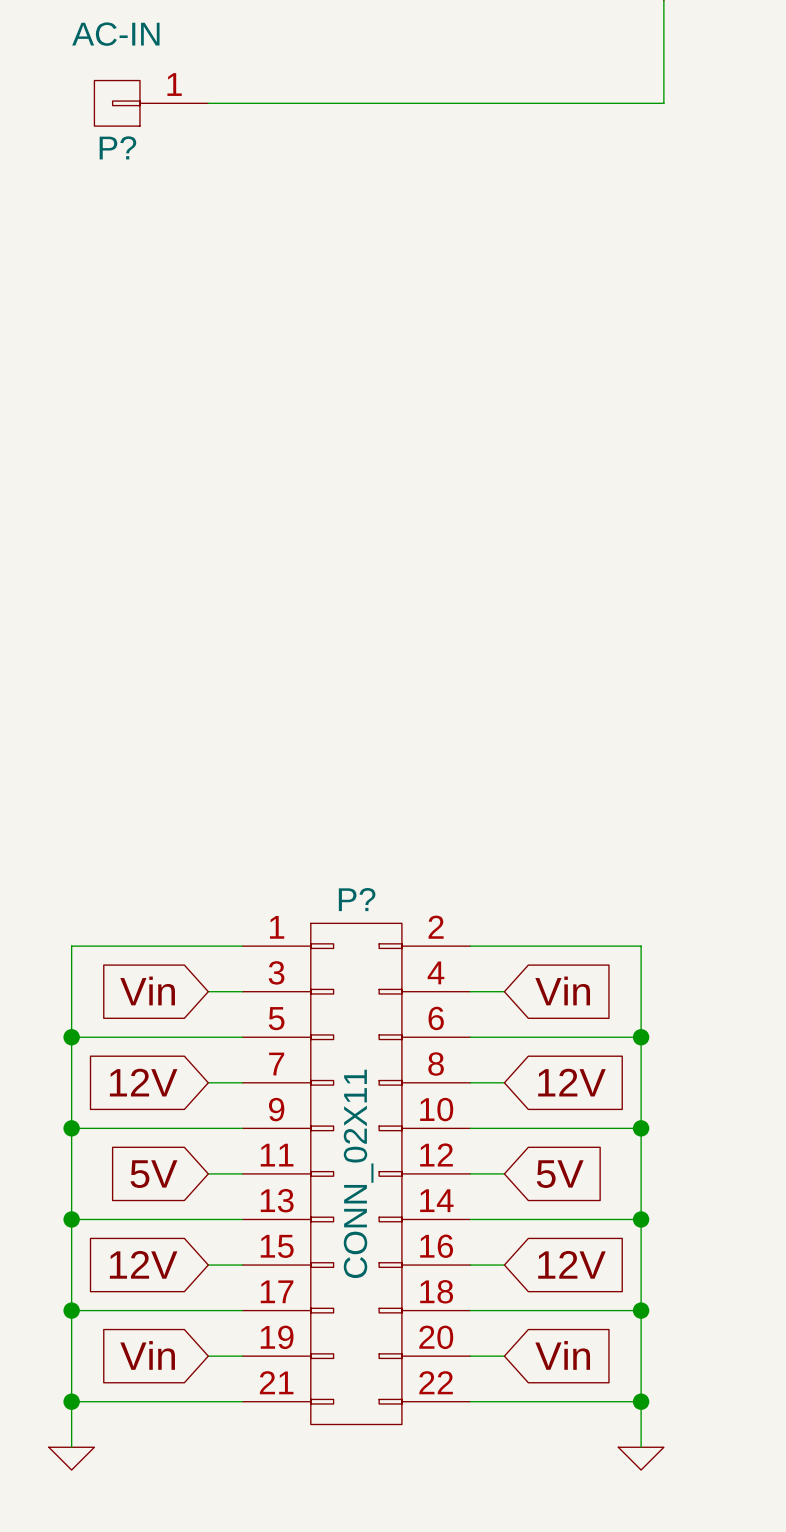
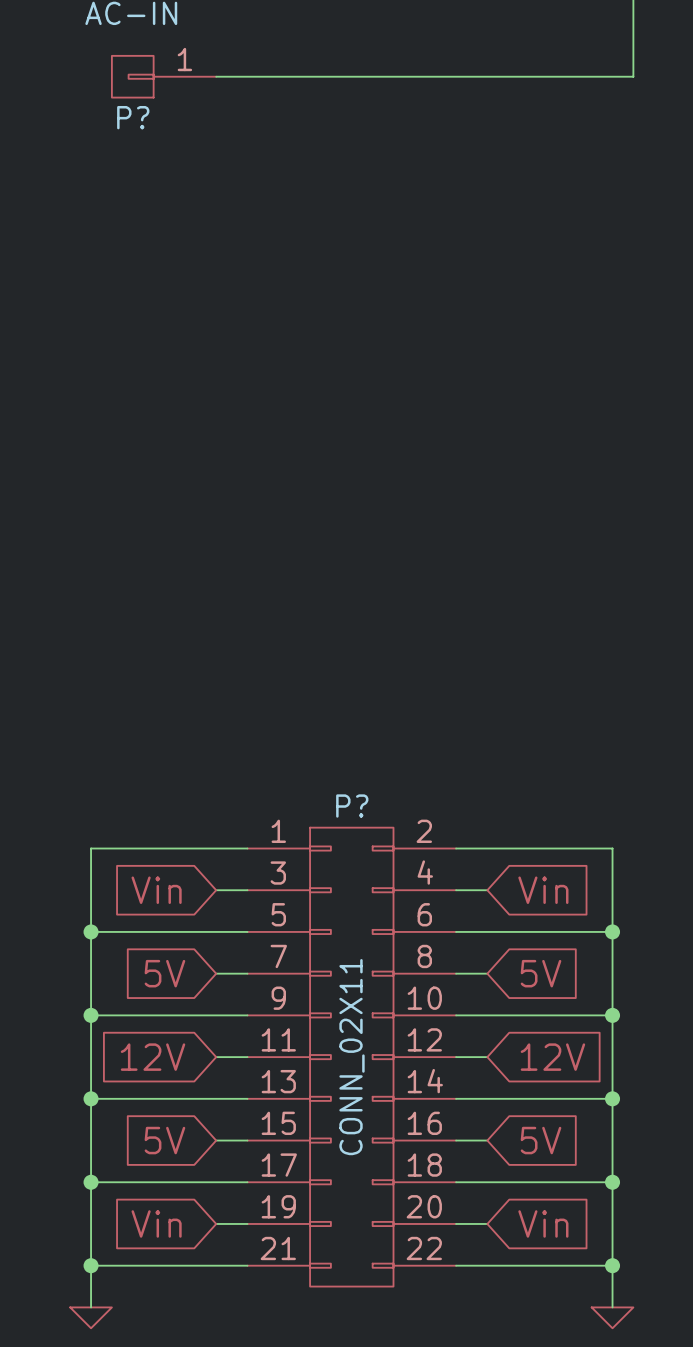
global label: 12V (143, 1082) -> 5V (164, 973)
global label: 12V (571, 1082) -> 5V (541, 973)
global label: 5V (153, 1174) -> 12V (153, 1057)
global label: 5V (560, 1174) -> 12V (552, 1057)
global label: 12V (143, 1264) -> 5V (164, 1140)
global label: 12V (571, 1264) -> 5V (541, 1140)

